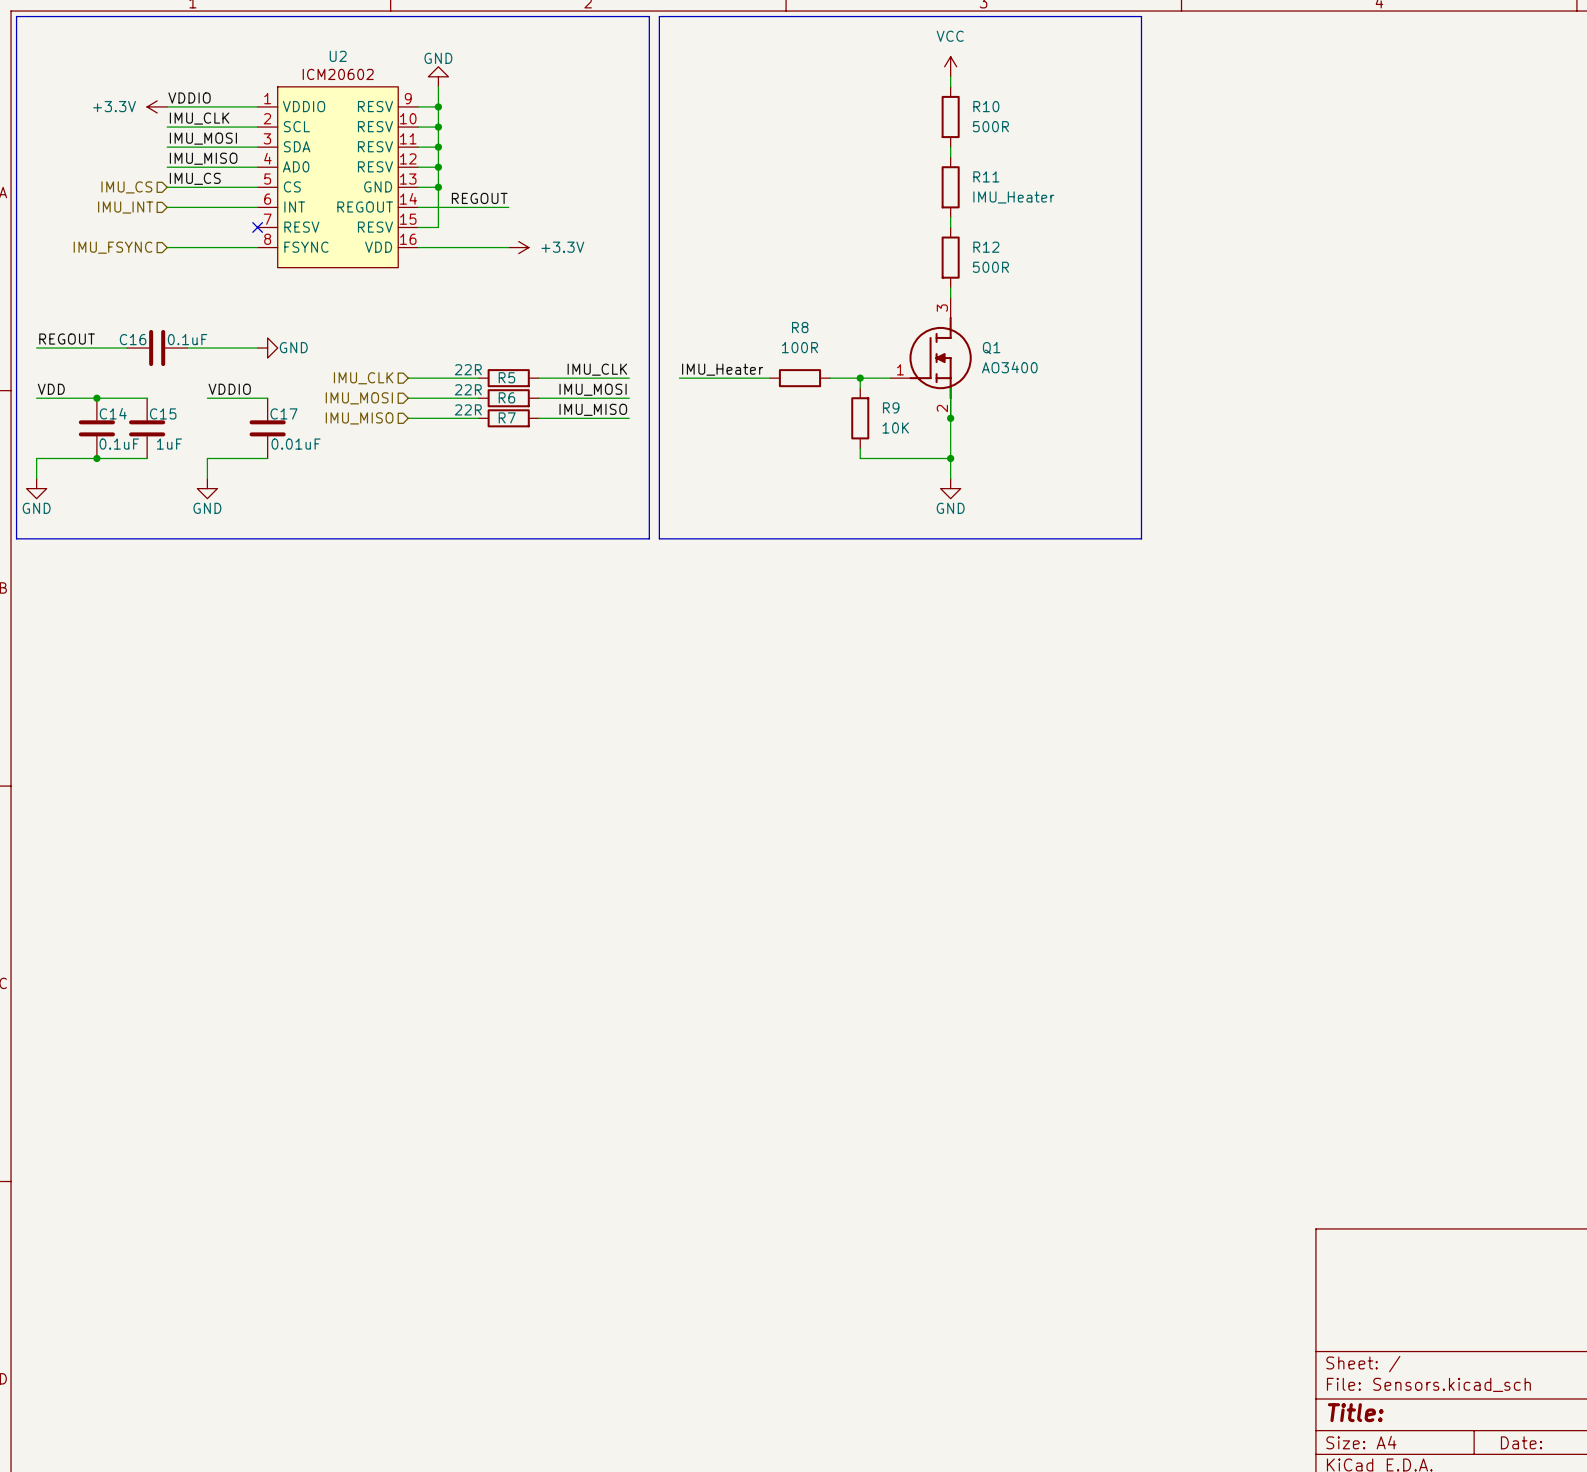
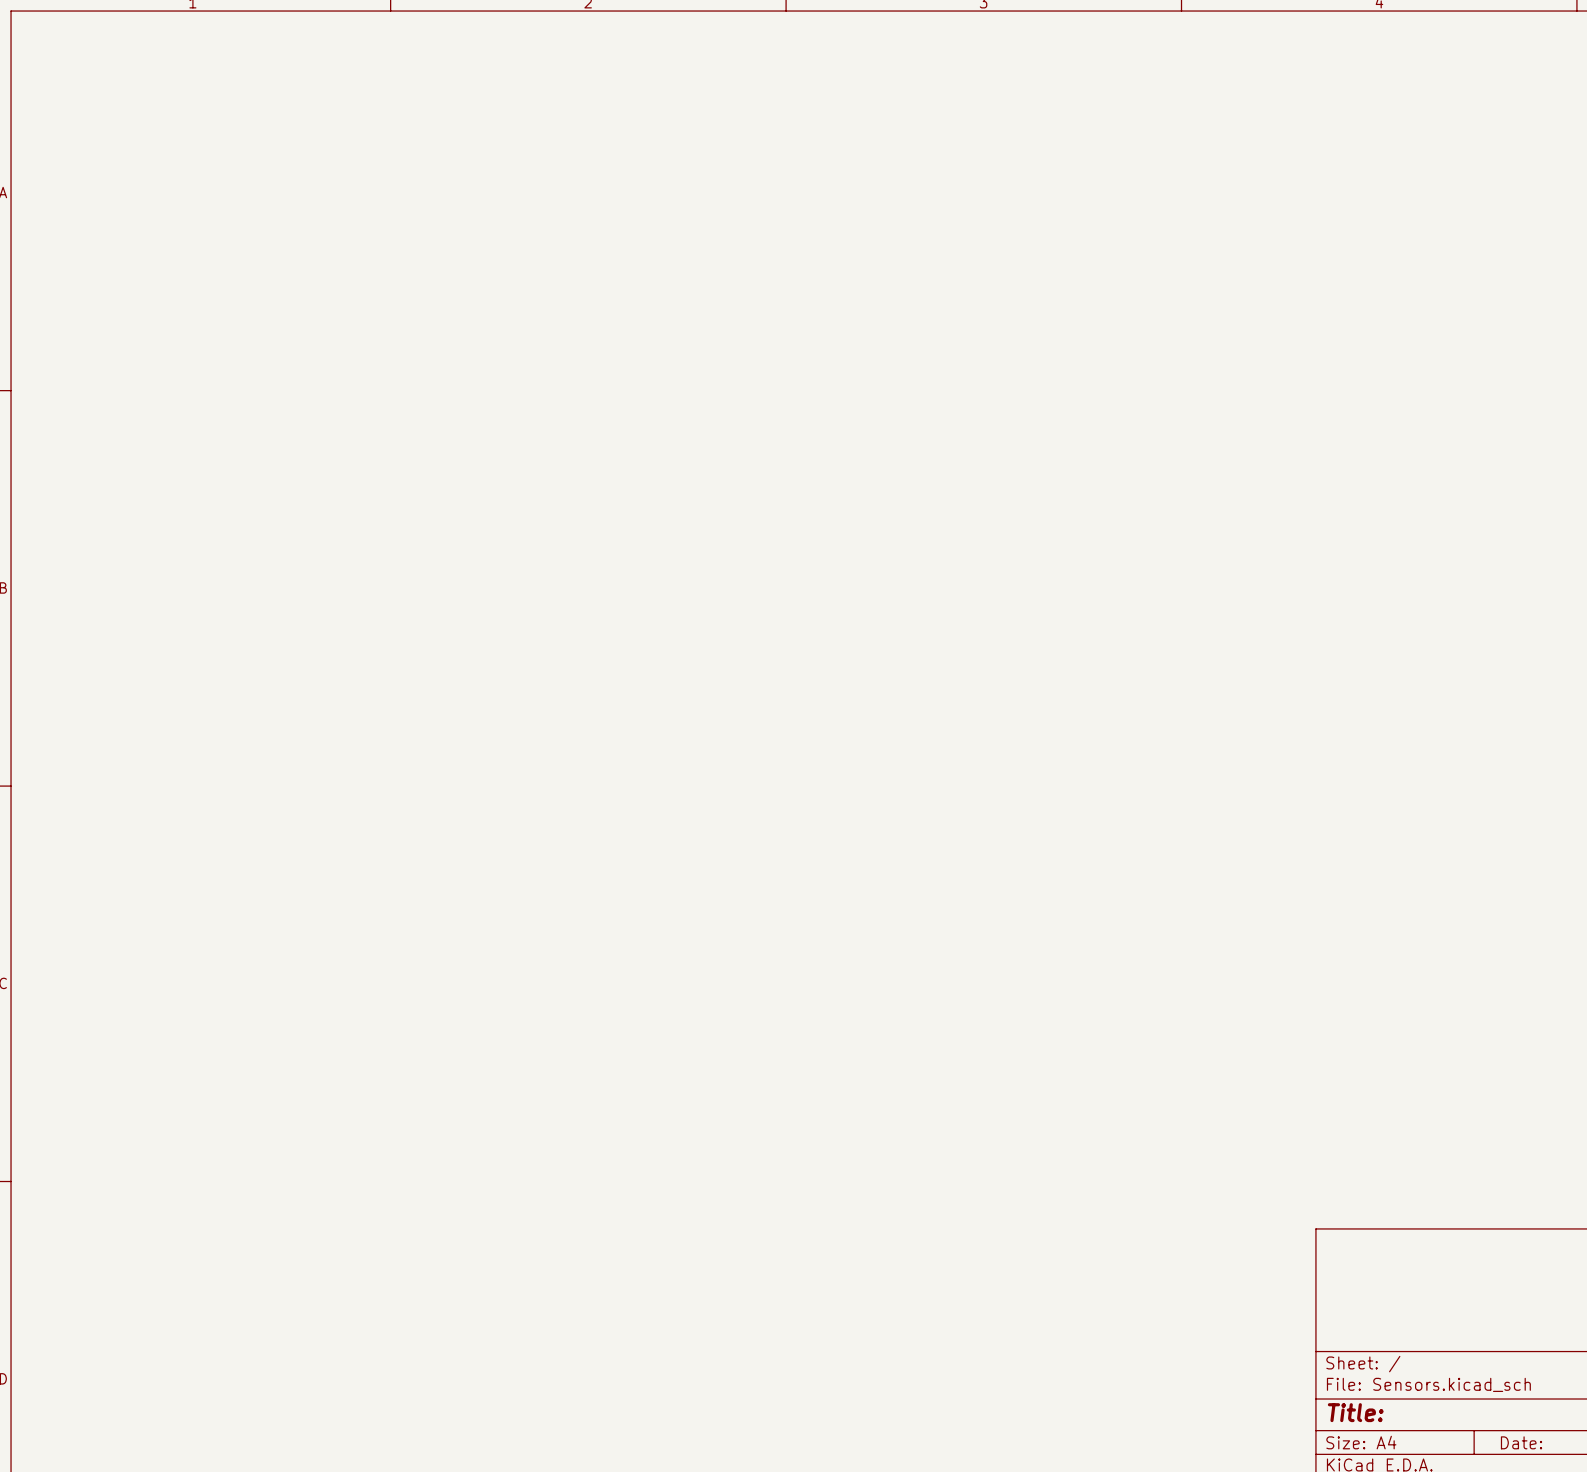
line: (16, 16) (649, 16) (649, 538) (16, 538) (16, 16) -> none
line: (659, 16) (1141, 16) (1141, 538) (659, 538) (659, 16) -> none
power symbol: VCC (950, 66) -> none
power symbol: GND (438, 76) -> none
wire: (950, 76) (950, 86) -> none
wire: (438, 86) (438, 227) (418, 227) -> none
label: VDDIO (189, 97) -> none
power symbol: +3.3V (157, 106) -> none
wire: (167, 106) (257, 106) -> none
wire: (418, 106) (438, 106) -> none
junction: (438, 106) -> none
R10: 500R (950, 116) -> none
label: IMU_CLK (199, 118) -> none
wire: (167, 127) (257, 127) -> none
wire: (418, 127) (438, 127) -> none
junction: (438, 127) -> none
label: IMU_MOSI (203, 138) -> none
wire: (167, 147) (257, 147) -> none
wire: (418, 147) (438, 147) -> none
junction: (438, 147) -> none
wire: (950, 147) (950, 157) -> none
label: IMU_MISO (203, 158) -> none
wire: (167, 167) (257, 167) -> none
wire: (418, 167) (438, 167) -> none
junction: (438, 167) -> none
U2: (337, 177) -> none
label: IMU_CS (195, 178) -> none
hierarchical label: IMU_CS (126, 187) -> none
wire: (167, 187) (257, 187) -> none
wire: (418, 187) (438, 187) -> none
junction: (438, 187) -> none
R11: IMU_Heater (950, 187) -> none
label: REGOUT (479, 198) -> none
hierarchical label: IMU_INT (125, 207) -> none
wire: (167, 207) (257, 207) -> none
wire: (418, 207) (508, 207) -> none
wire: (950, 217) (950, 227) -> none
no-connect mark: (257, 227) -> none
hierarchical label: IMU_FSYNC (113, 247) -> none
wire: (167, 247) (257, 247) -> none
wire: (418, 247) (508, 247) -> none
power symbol: +3.3V (518, 247) -> none
R12: 500R (950, 257) -> none
wire: (950, 287) (950, 297) -> none
label: REGOUT (67, 339) -> none
wire: (36, 348) (127, 348) -> none
C16: 0.1uF (157, 348) -> none
wire: (187, 348) (257, 348) -> none
power symbol: GND (267, 348) -> none
Q1: AO3400 (931, 358) -> none
label: IMU_CLK (597, 369) -> none
label: IMU_Heater (722, 369) -> none
hierarchical label: IMU_CLK (363, 378) -> none
wire: (408, 378) (478, 378) -> none
R5: 22R (508, 378) -> none
wire: (538, 378) (629, 378) -> none
wire: (679, 378) (769, 378) -> none
R8: 100R (799, 378) -> none
wire: (830, 378) (890, 378) -> none
wire: (860, 378) (860, 388) -> none
junction: (860, 378) -> none
wire: (950, 388) (950, 478) -> none
label: VDD (51, 389) -> none
label: VDDIO (229, 389) -> none
label: IMU_MOSI (593, 389) -> none
wire: (36, 398) (147, 398) -> none
junction: (96, 398) -> none
wire: (207, 398) (267, 398) -> none
hierarchical label: IMU_MOSI (359, 398) -> none
wire: (408, 398) (478, 398) -> none
R6: 22R (508, 398) -> none
wire: (538, 398) (629, 398) -> none
label: IMU_MISO (593, 409) -> none
hierarchical label: IMU_MISO (359, 418) -> none
wire: (408, 418) (478, 418) -> none
R7: 22R (508, 418) -> none
wire: (538, 418) (629, 418) -> none
R9: 10K (860, 418) -> none
junction: (950, 418) -> none
C14: 0.1uF (96, 428) -> none
C15: 1uF (147, 428) -> none
C17: 0.01uF (267, 428) -> none
wire: (860, 448) (860, 458) (950, 458) -> none
junction: (96, 458) -> none
wire: (147, 458) (36, 458) (36, 478) -> none
wire: (267, 458) (207, 458) (207, 478) -> none
junction: (950, 458) -> none
power symbol: GND (36, 488) -> none
power symbol: GND (207, 488) -> none
power symbol: GND (950, 488) -> none

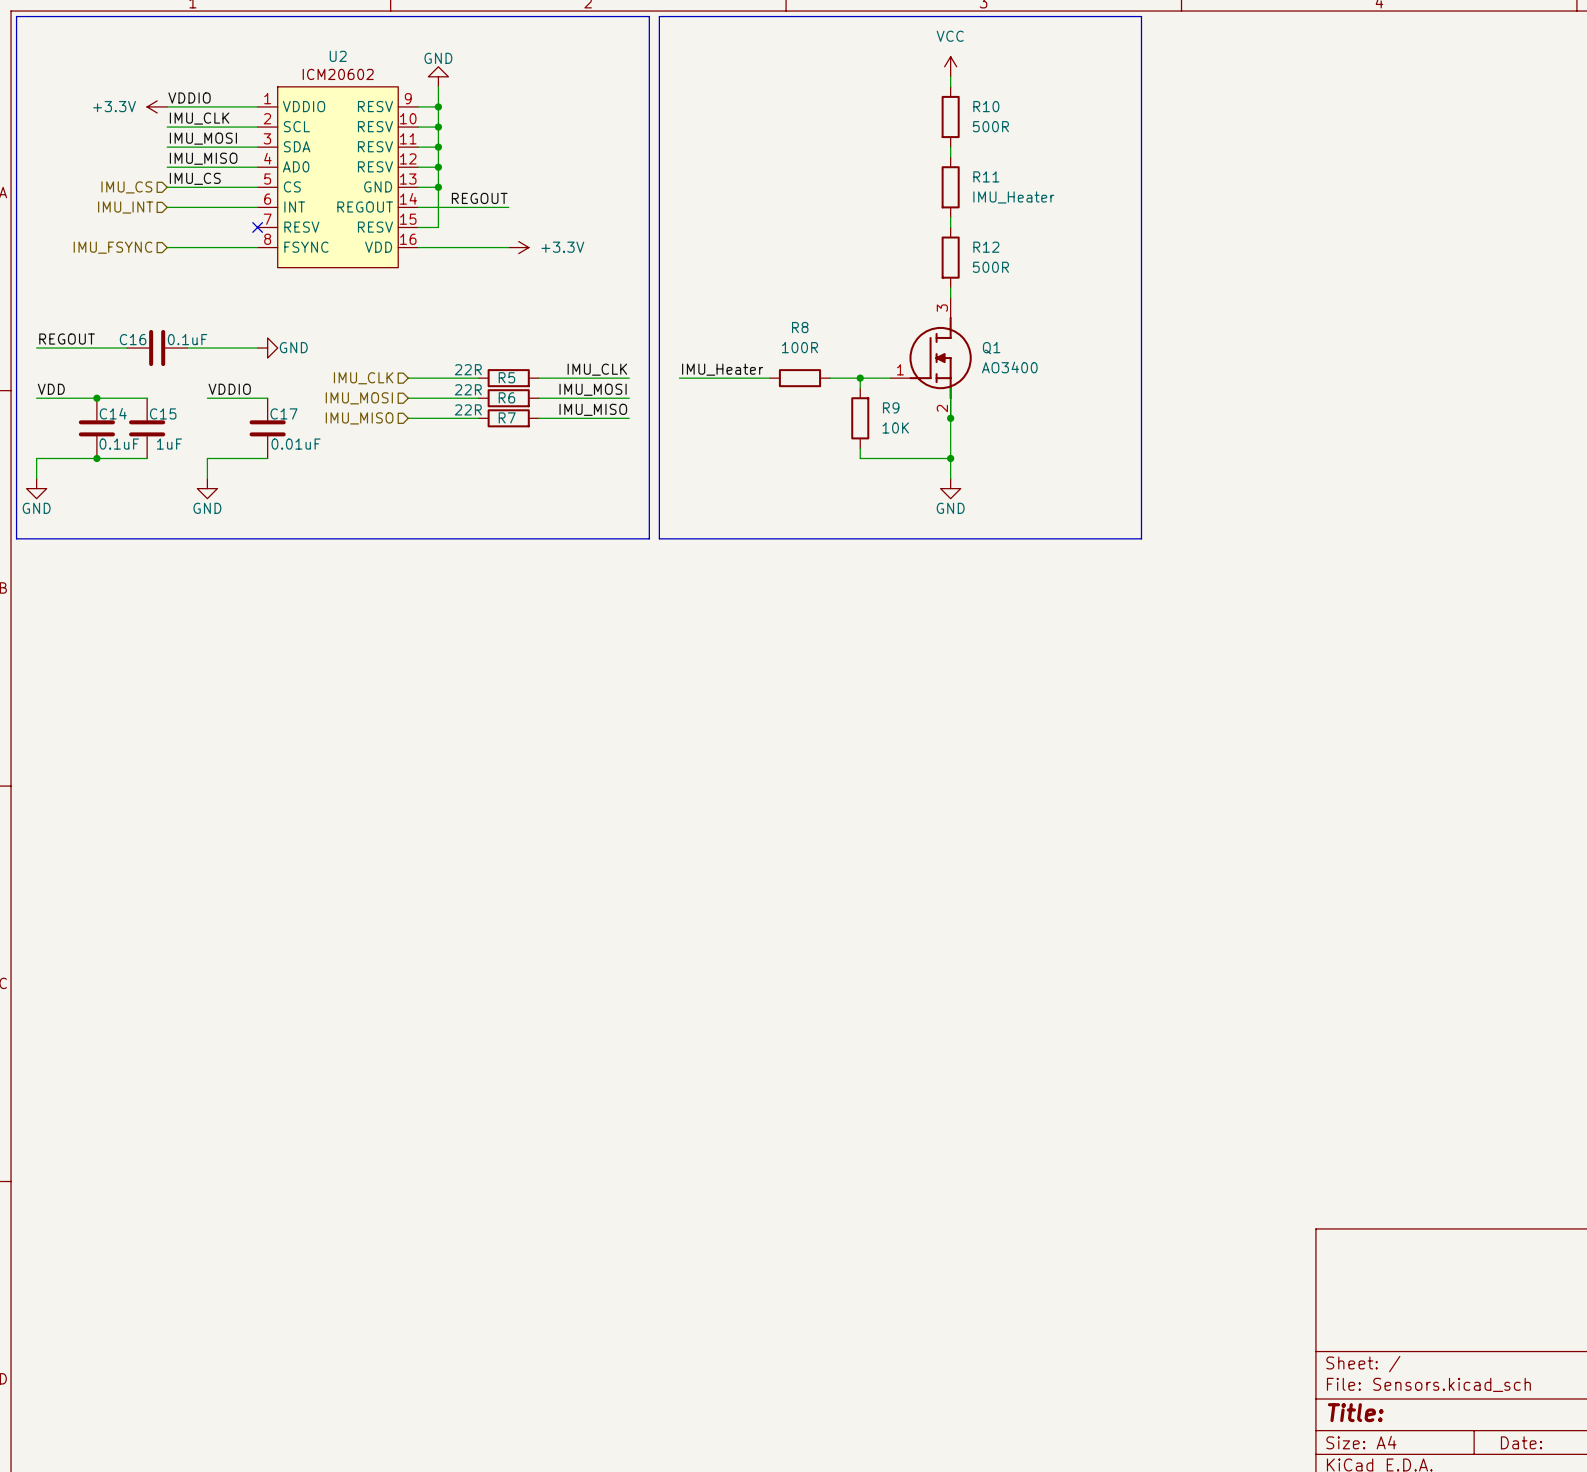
line: none -> (16, 16) (649, 16) (649, 538) (16, 538) (16, 16)
line: none -> (659, 16) (1141, 16) (1141, 538) (659, 538) (659, 16)
power symbol: none -> VCC (950, 66)
power symbol: none -> GND (438, 76)
wire: none -> (950, 76) (950, 86)
wire: none -> (438, 86) (438, 227) (418, 227)
label: none -> VDDIO (189, 97)
power symbol: none -> +3.3V (157, 106)
wire: none -> (167, 106) (257, 106)
wire: none -> (418, 106) (438, 106)
junction: none -> (438, 106)
R10: none -> 500R (950, 116)
label: none -> IMU_CLK (199, 118)
wire: none -> (167, 127) (257, 127)
wire: none -> (418, 127) (438, 127)
junction: none -> (438, 127)
label: none -> IMU_MOSI (203, 138)
wire: none -> (167, 147) (257, 147)
wire: none -> (418, 147) (438, 147)
junction: none -> (438, 147)
wire: none -> (950, 147) (950, 157)
label: none -> IMU_MISO (203, 158)
wire: none -> (167, 167) (257, 167)
wire: none -> (418, 167) (438, 167)
junction: none -> (438, 167)
U2: none -> (337, 177)
label: none -> IMU_CS (195, 178)
hierarchical label: none -> IMU_CS (126, 187)
wire: none -> (167, 187) (257, 187)
wire: none -> (418, 187) (438, 187)
junction: none -> (438, 187)
R11: none -> IMU_Heater (950, 187)
label: none -> REGOUT (479, 198)
hierarchical label: none -> IMU_INT (125, 207)
wire: none -> (167, 207) (257, 207)
wire: none -> (418, 207) (508, 207)
wire: none -> (950, 217) (950, 227)
no-connect mark: none -> (257, 227)
hierarchical label: none -> IMU_FSYNC (113, 247)
wire: none -> (167, 247) (257, 247)
wire: none -> (418, 247) (508, 247)
power symbol: none -> +3.3V (518, 247)
R12: none -> 500R (950, 257)
wire: none -> (950, 287) (950, 297)
label: none -> REGOUT (67, 339)
wire: none -> (36, 348) (127, 348)
C16: none -> 0.1uF (157, 348)
wire: none -> (187, 348) (257, 348)
power symbol: none -> GND (267, 348)
Q1: none -> AO3400 (931, 358)
label: none -> IMU_CLK (597, 369)
label: none -> IMU_Heater (722, 369)
hierarchical label: none -> IMU_CLK (363, 378)
wire: none -> (408, 378) (478, 378)
R5: none -> 22R (508, 378)
wire: none -> (538, 378) (629, 378)
wire: none -> (679, 378) (769, 378)
R8: none -> 100R (799, 378)
wire: none -> (830, 378) (890, 378)
wire: none -> (860, 378) (860, 388)
junction: none -> (860, 378)
wire: none -> (950, 388) (950, 478)
label: none -> VDD (51, 389)
label: none -> VDDIO (229, 389)
label: none -> IMU_MOSI (593, 389)
wire: none -> (36, 398) (147, 398)
junction: none -> (96, 398)
wire: none -> (207, 398) (267, 398)
hierarchical label: none -> IMU_MOSI (359, 398)
wire: none -> (408, 398) (478, 398)
R6: none -> 22R (508, 398)
wire: none -> (538, 398) (629, 398)
label: none -> IMU_MISO (593, 409)
hierarchical label: none -> IMU_MISO (359, 418)
wire: none -> (408, 418) (478, 418)
R7: none -> 22R (508, 418)
wire: none -> (538, 418) (629, 418)
R9: none -> 10K (860, 418)
junction: none -> (950, 418)
C14: none -> 0.1uF (96, 428)
C15: none -> 1uF (147, 428)
C17: none -> 0.01uF (267, 428)
wire: none -> (860, 448) (860, 458) (950, 458)
junction: none -> (96, 458)
wire: none -> (147, 458) (36, 458) (36, 478)
wire: none -> (267, 458) (207, 458) (207, 478)
junction: none -> (950, 458)
power symbol: none -> GND (36, 488)
power symbol: none -> GND (207, 488)
power symbol: none -> GND (950, 488)

